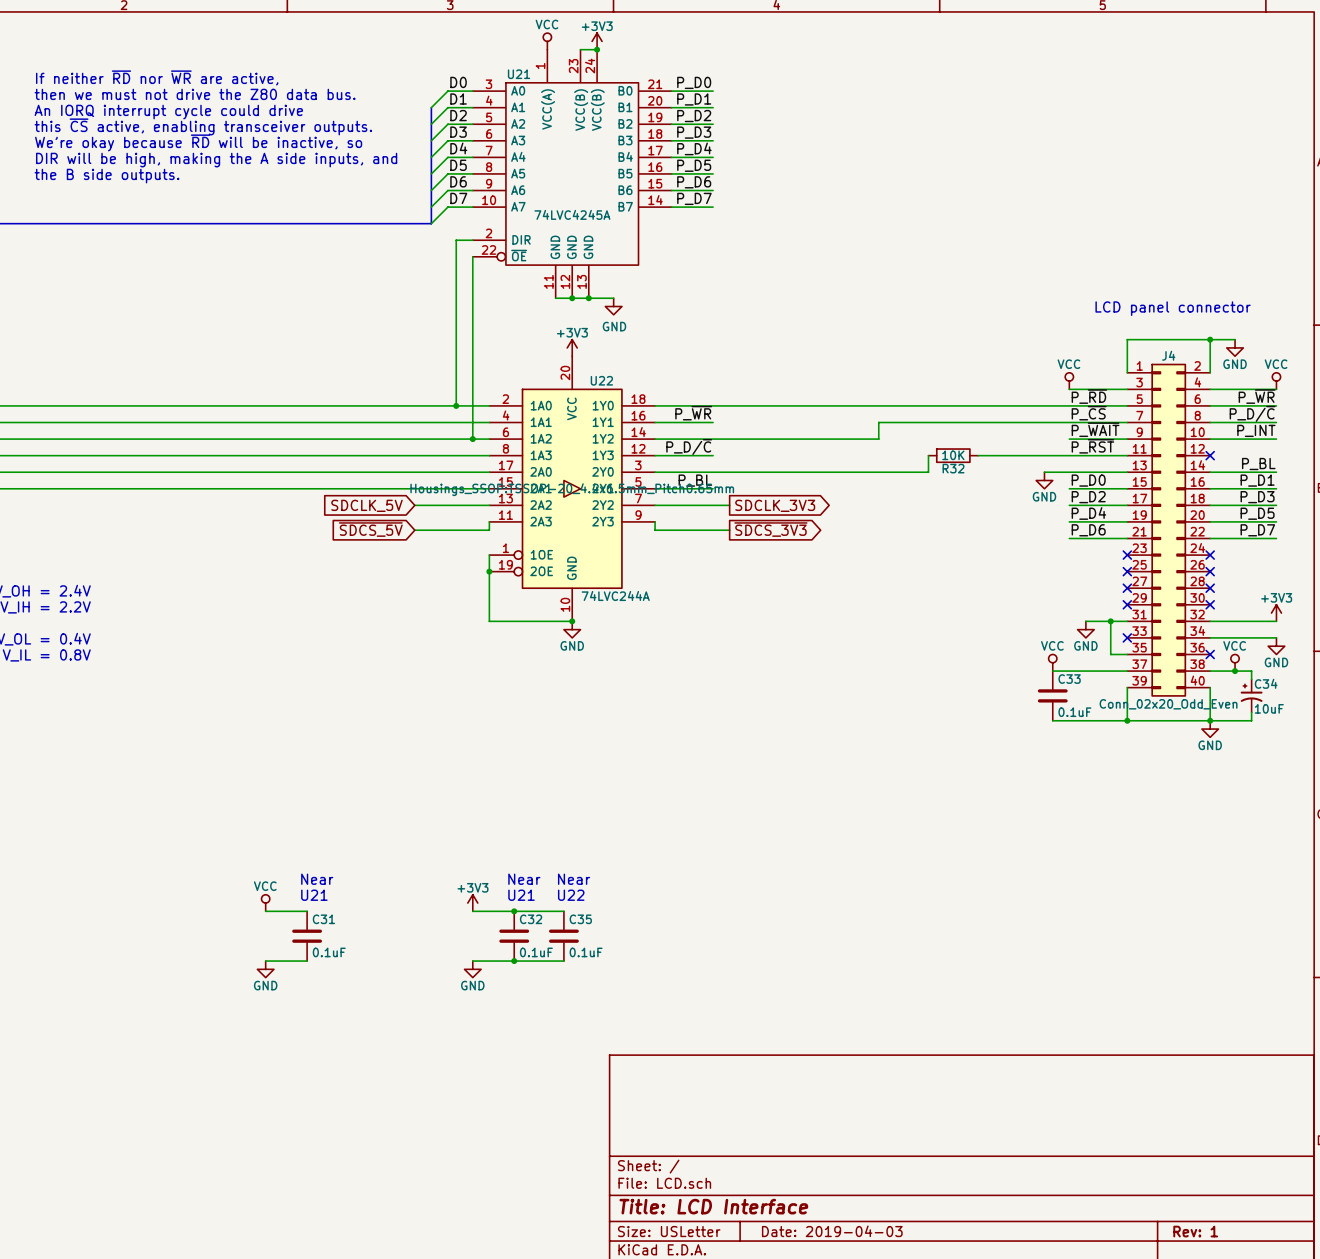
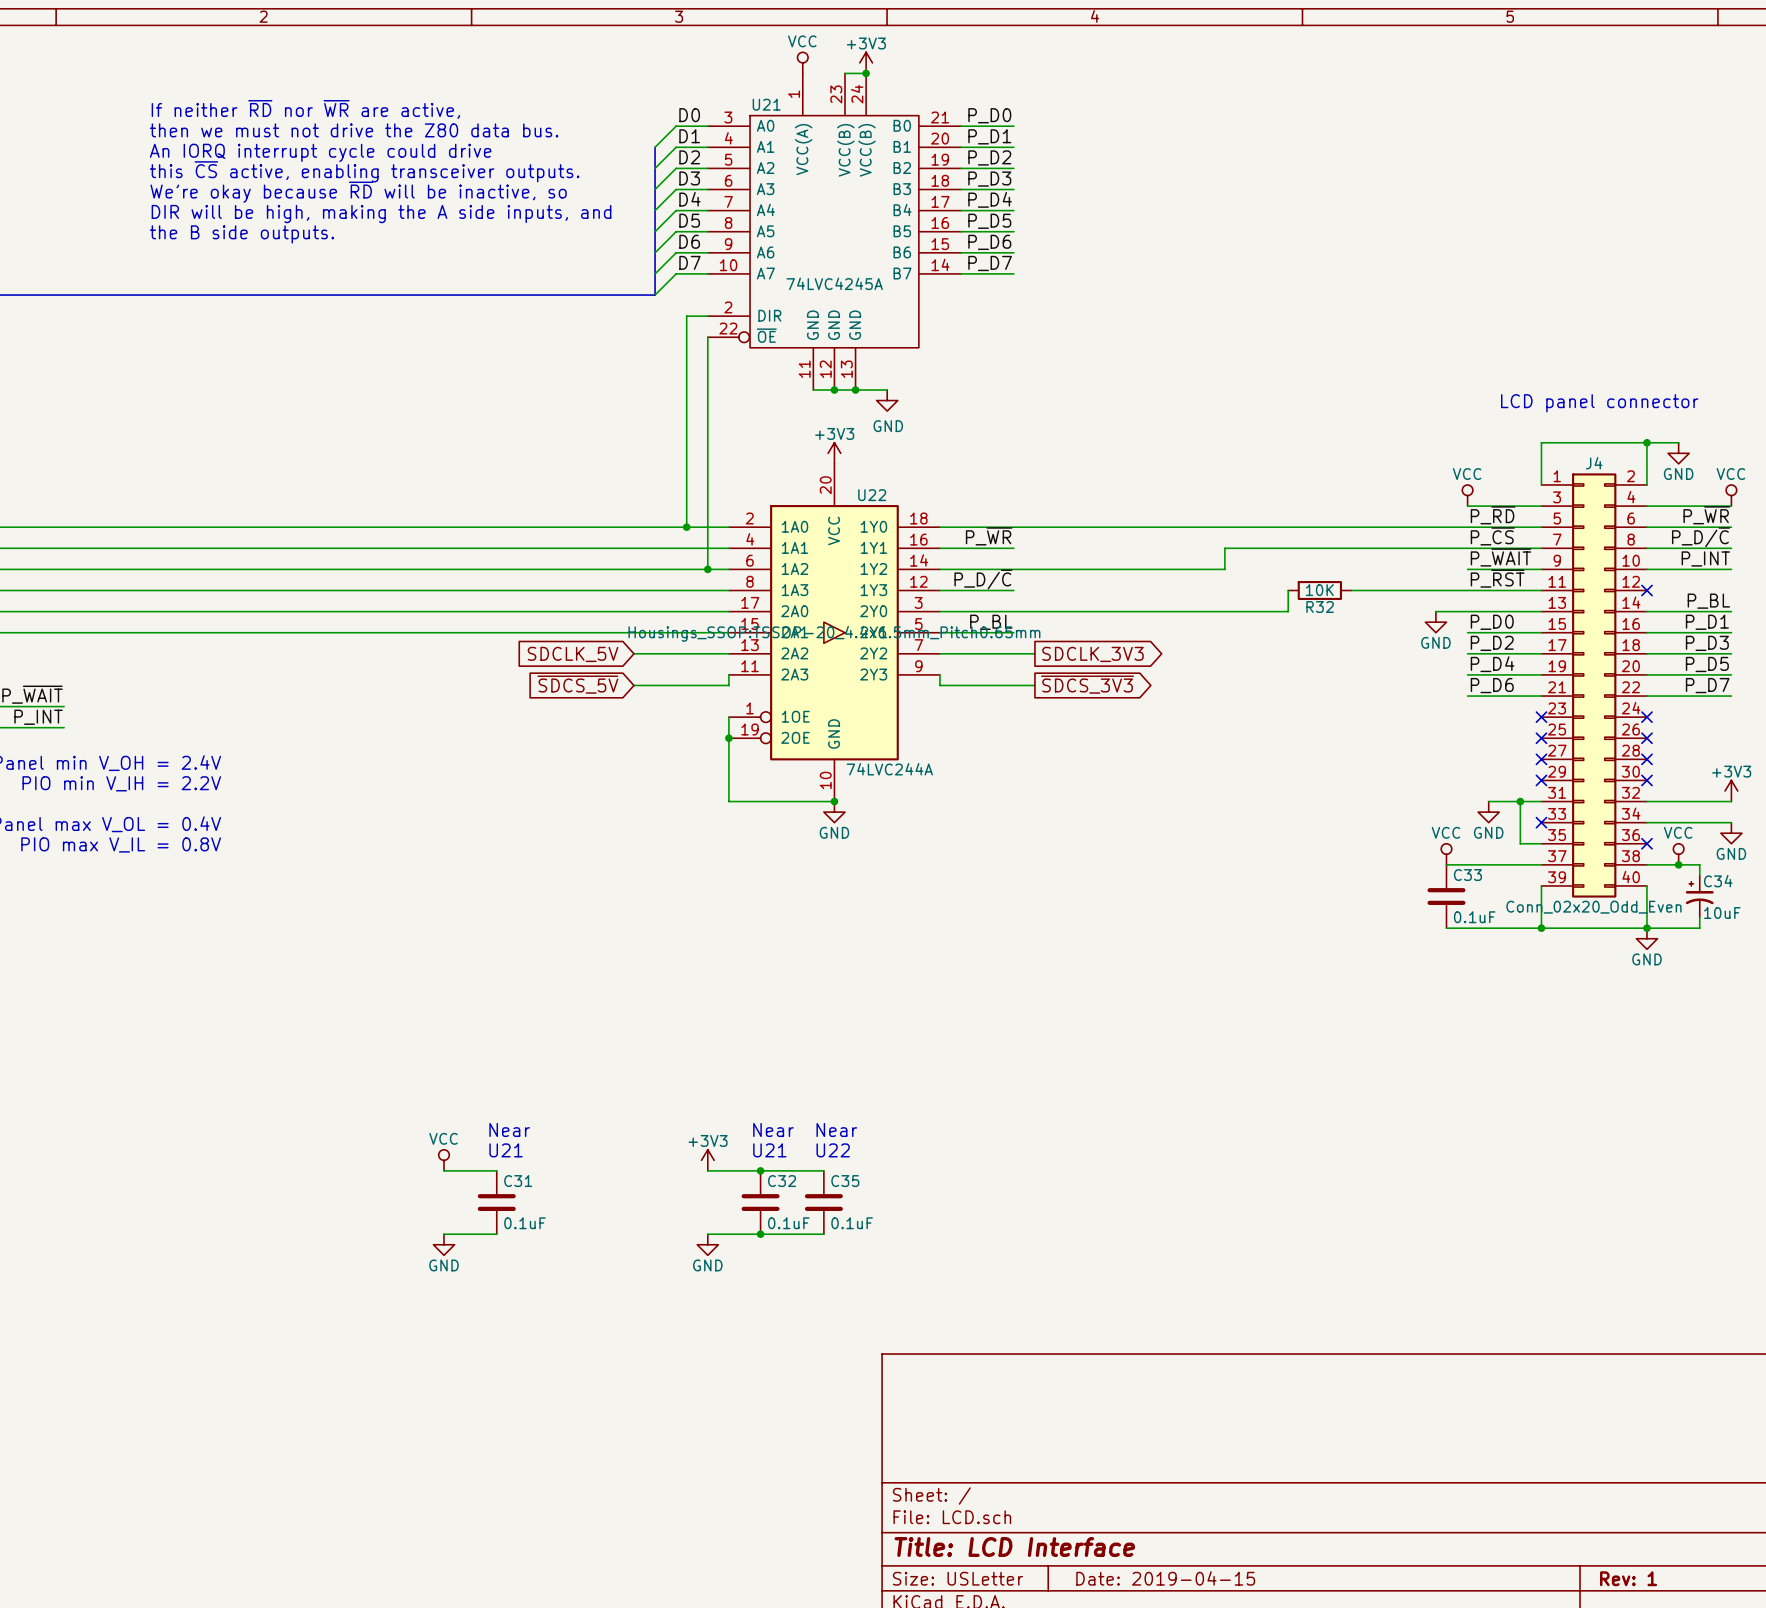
title block: Date: 2019-04-03 (832, 1231) -> Date: 2019-04-15 (1165, 1578)

